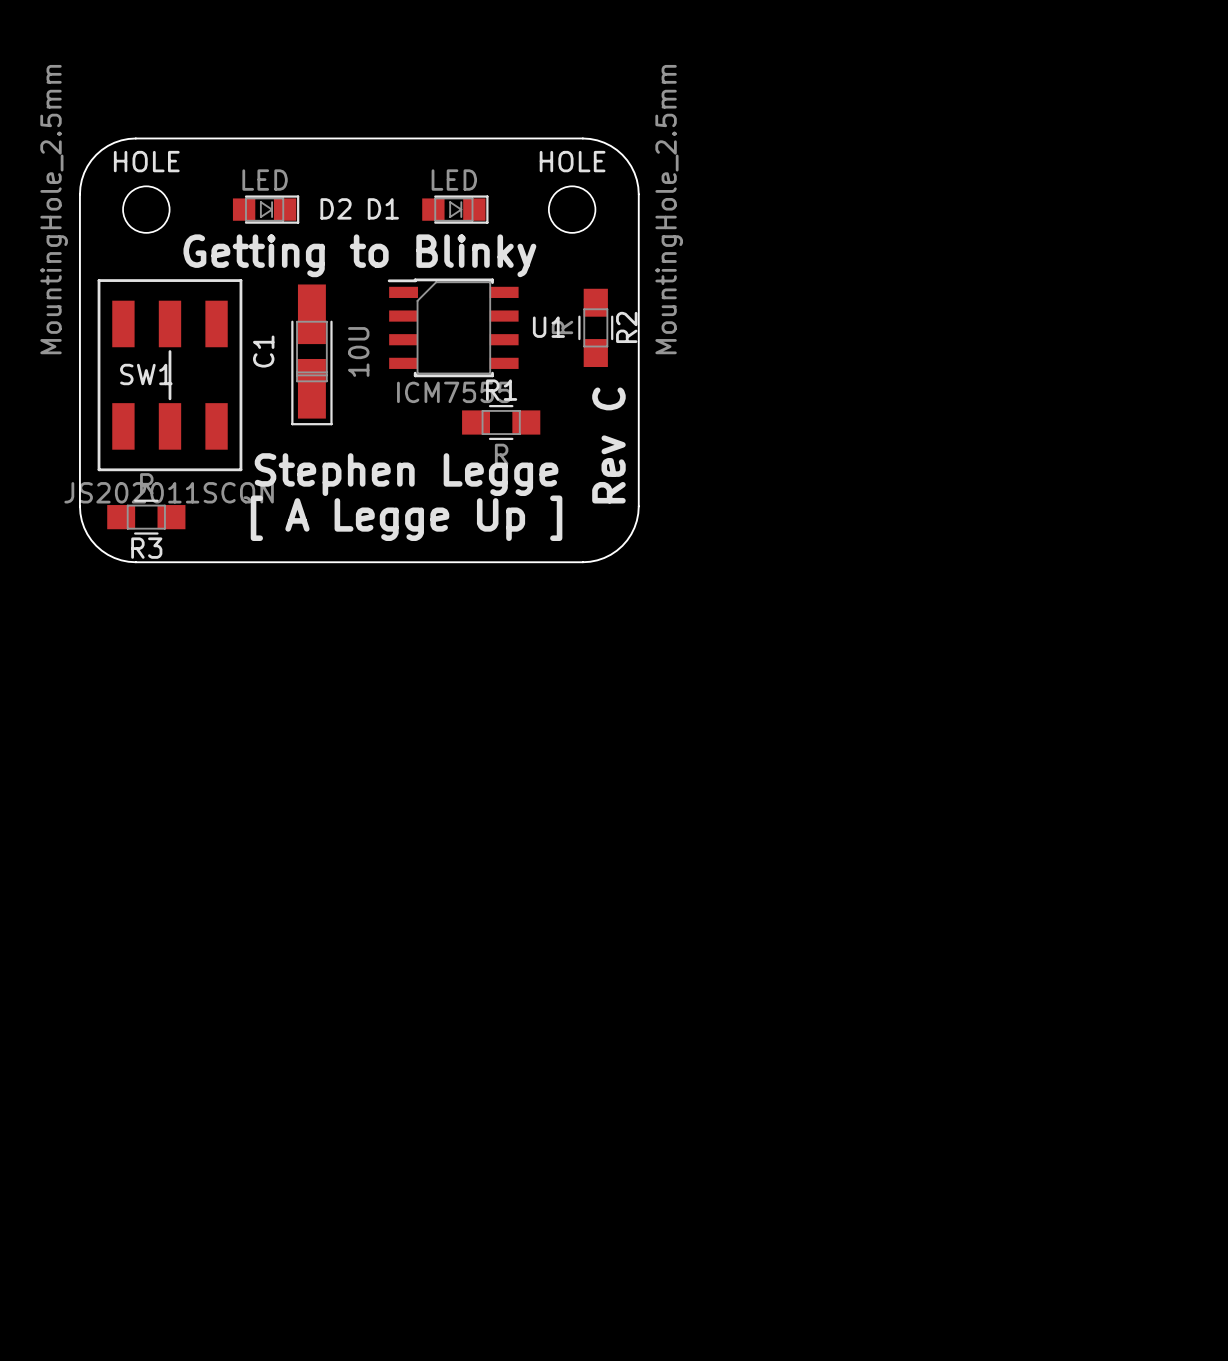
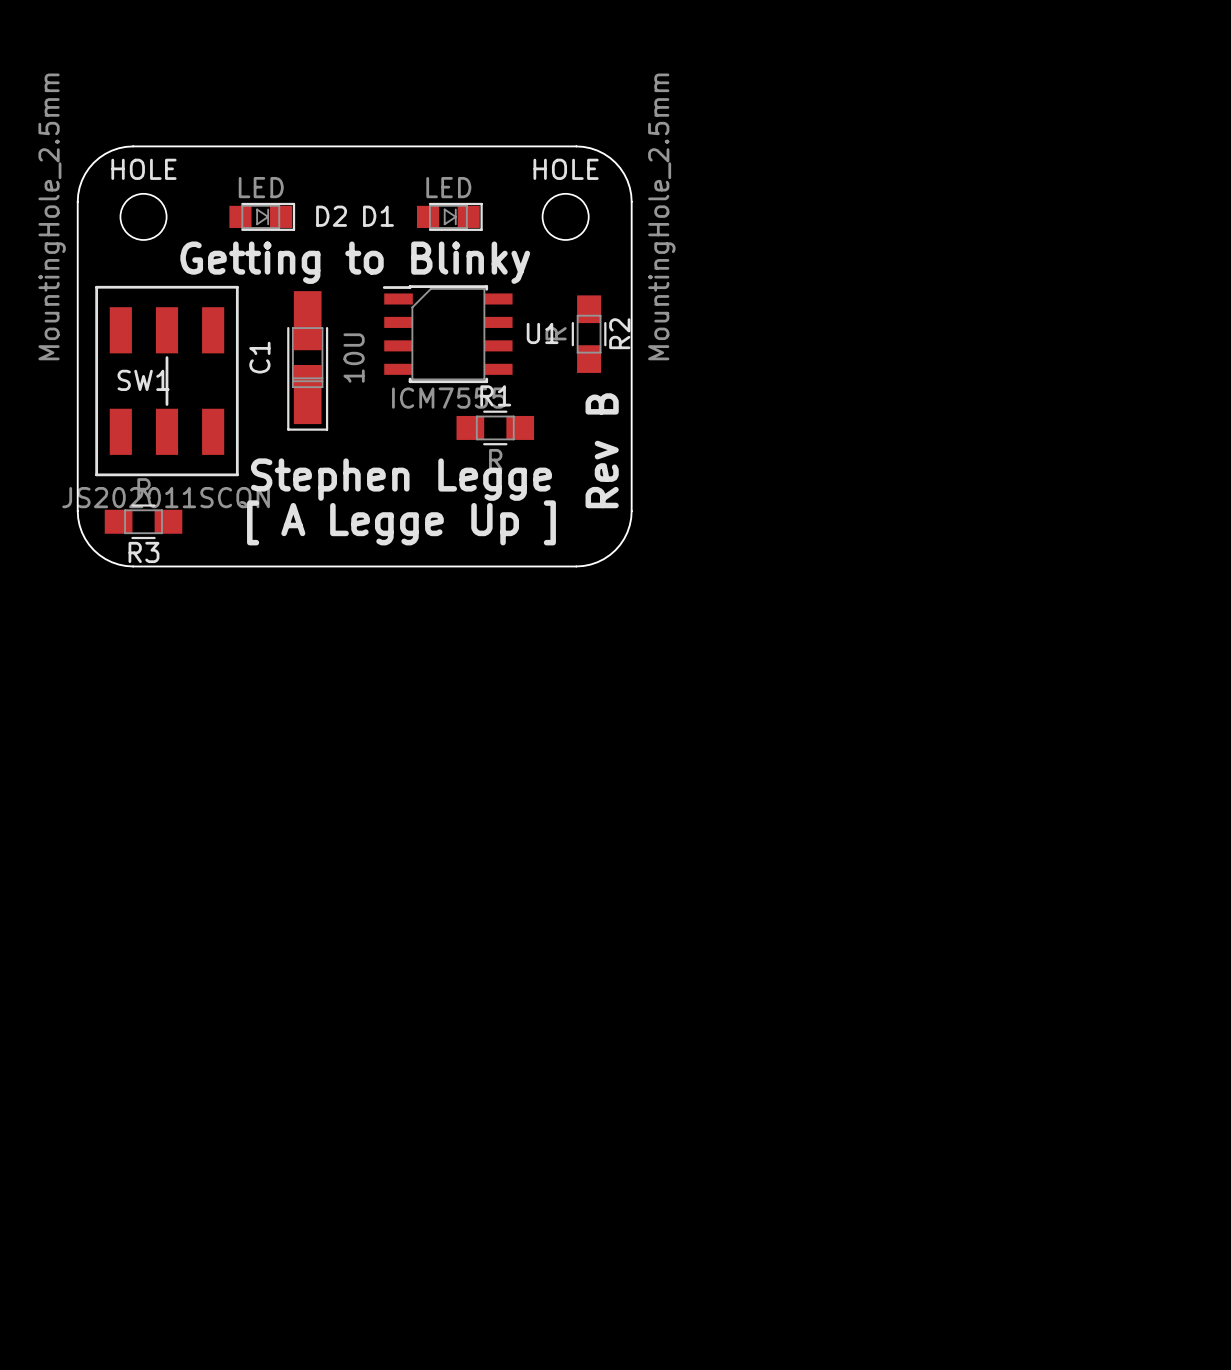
text: Rev C (608, 445) -> Rev B (602, 450)

